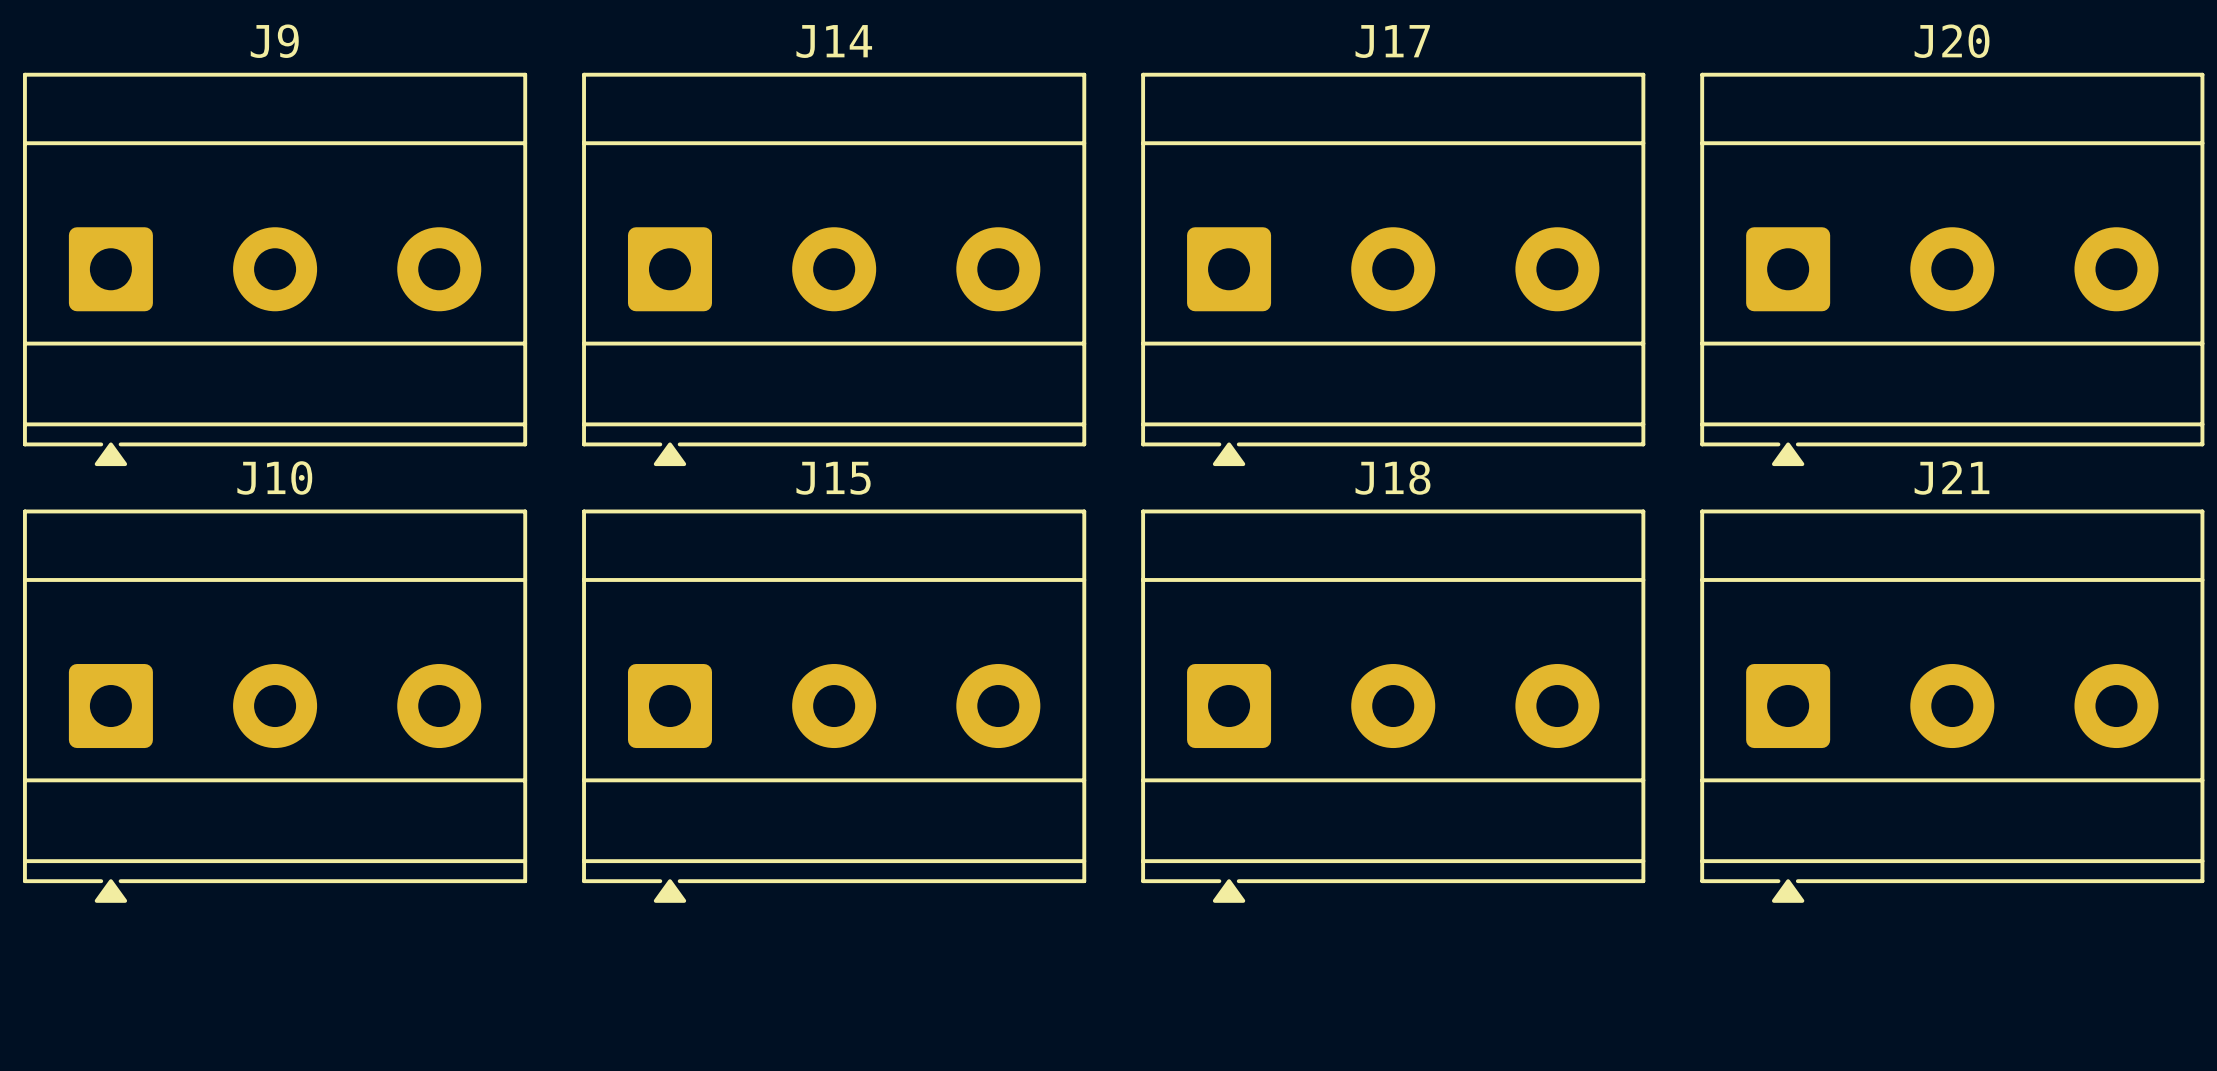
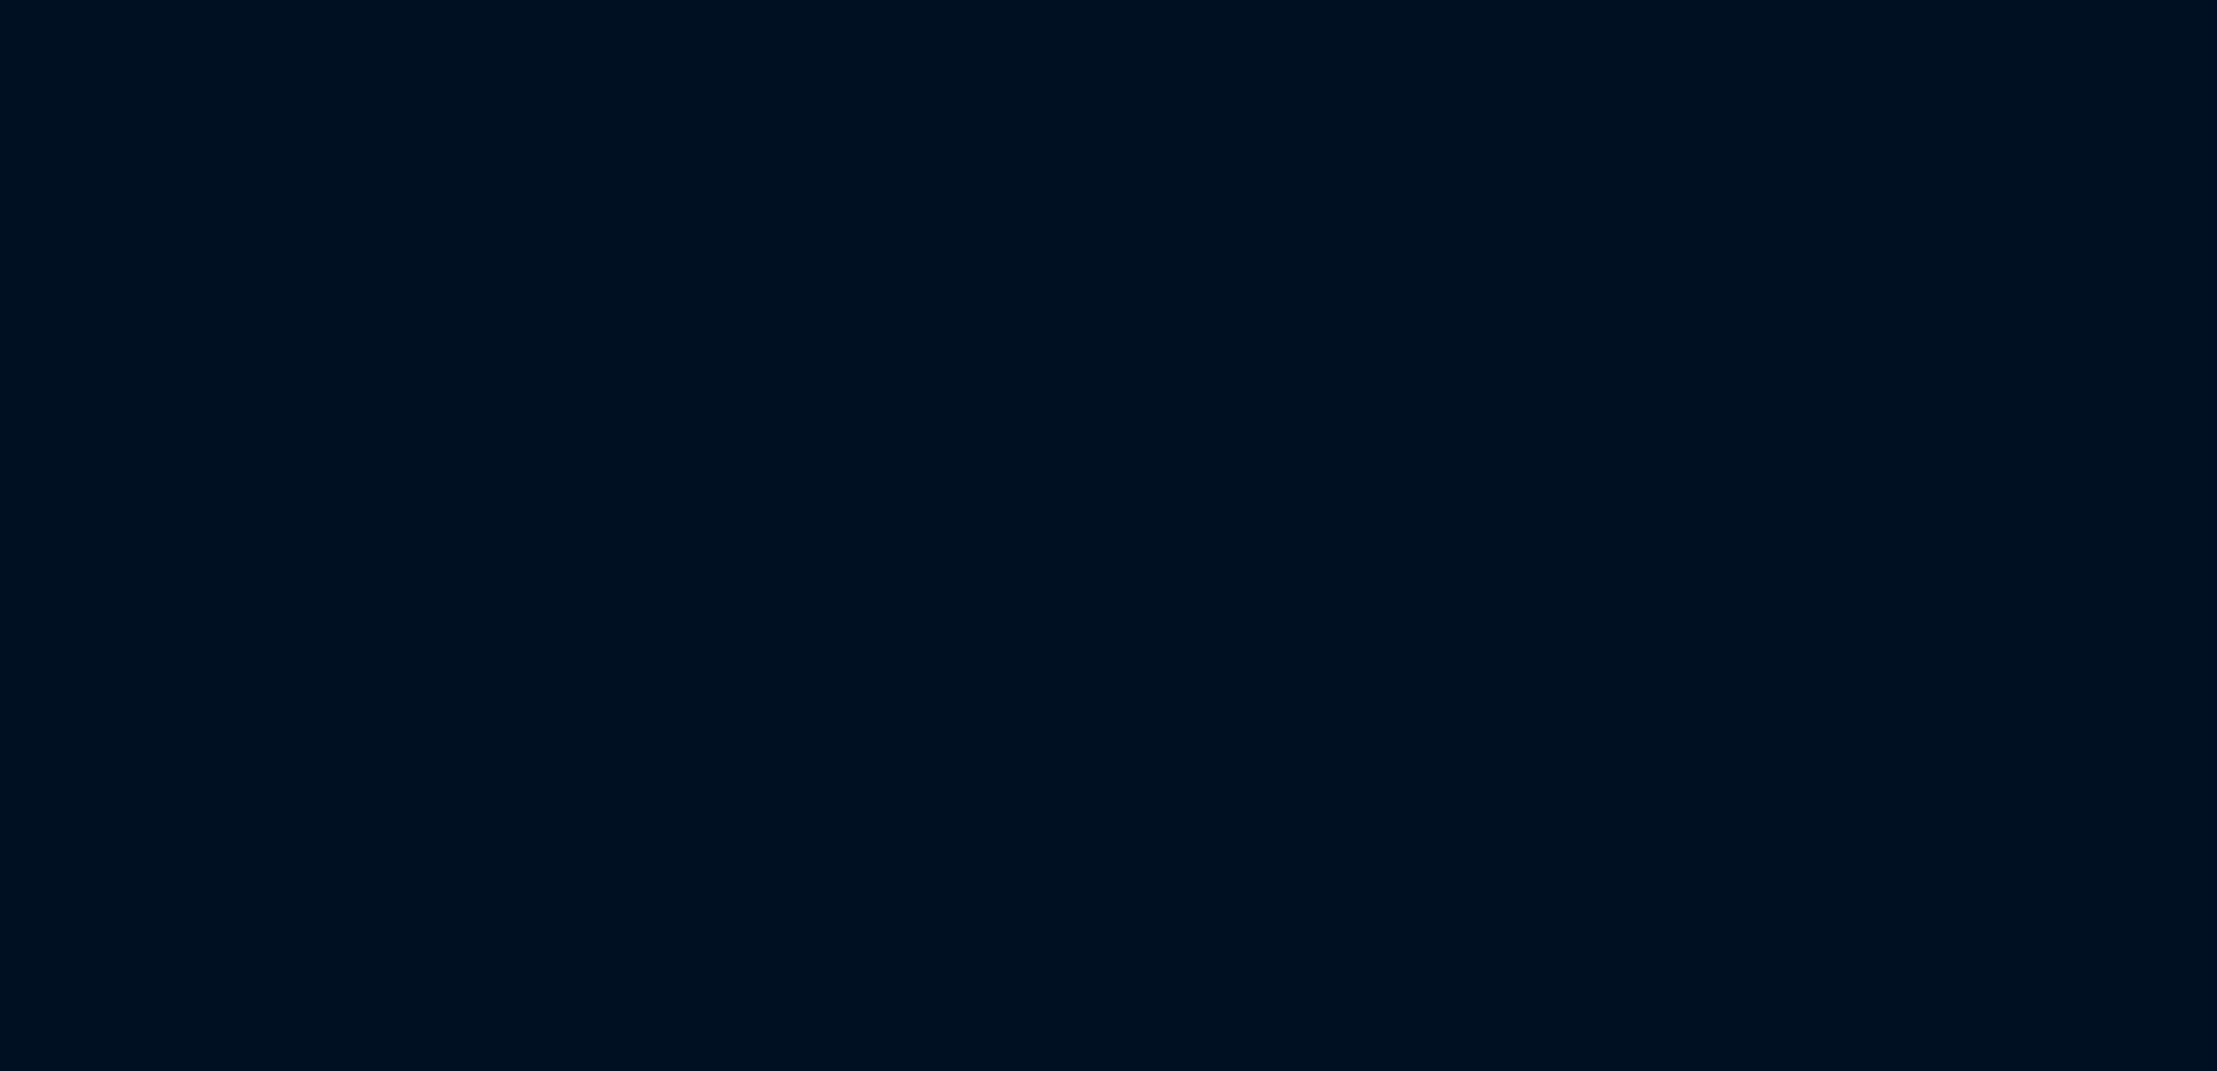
J9: (275, 269) -> none
J14: (834, 269) -> none
J17: (1393, 269) -> none
J20: (1952, 269) -> none
J10: (275, 706) -> none
J15: (834, 706) -> none
J18: (1393, 706) -> none
J21: (1952, 706) -> none

